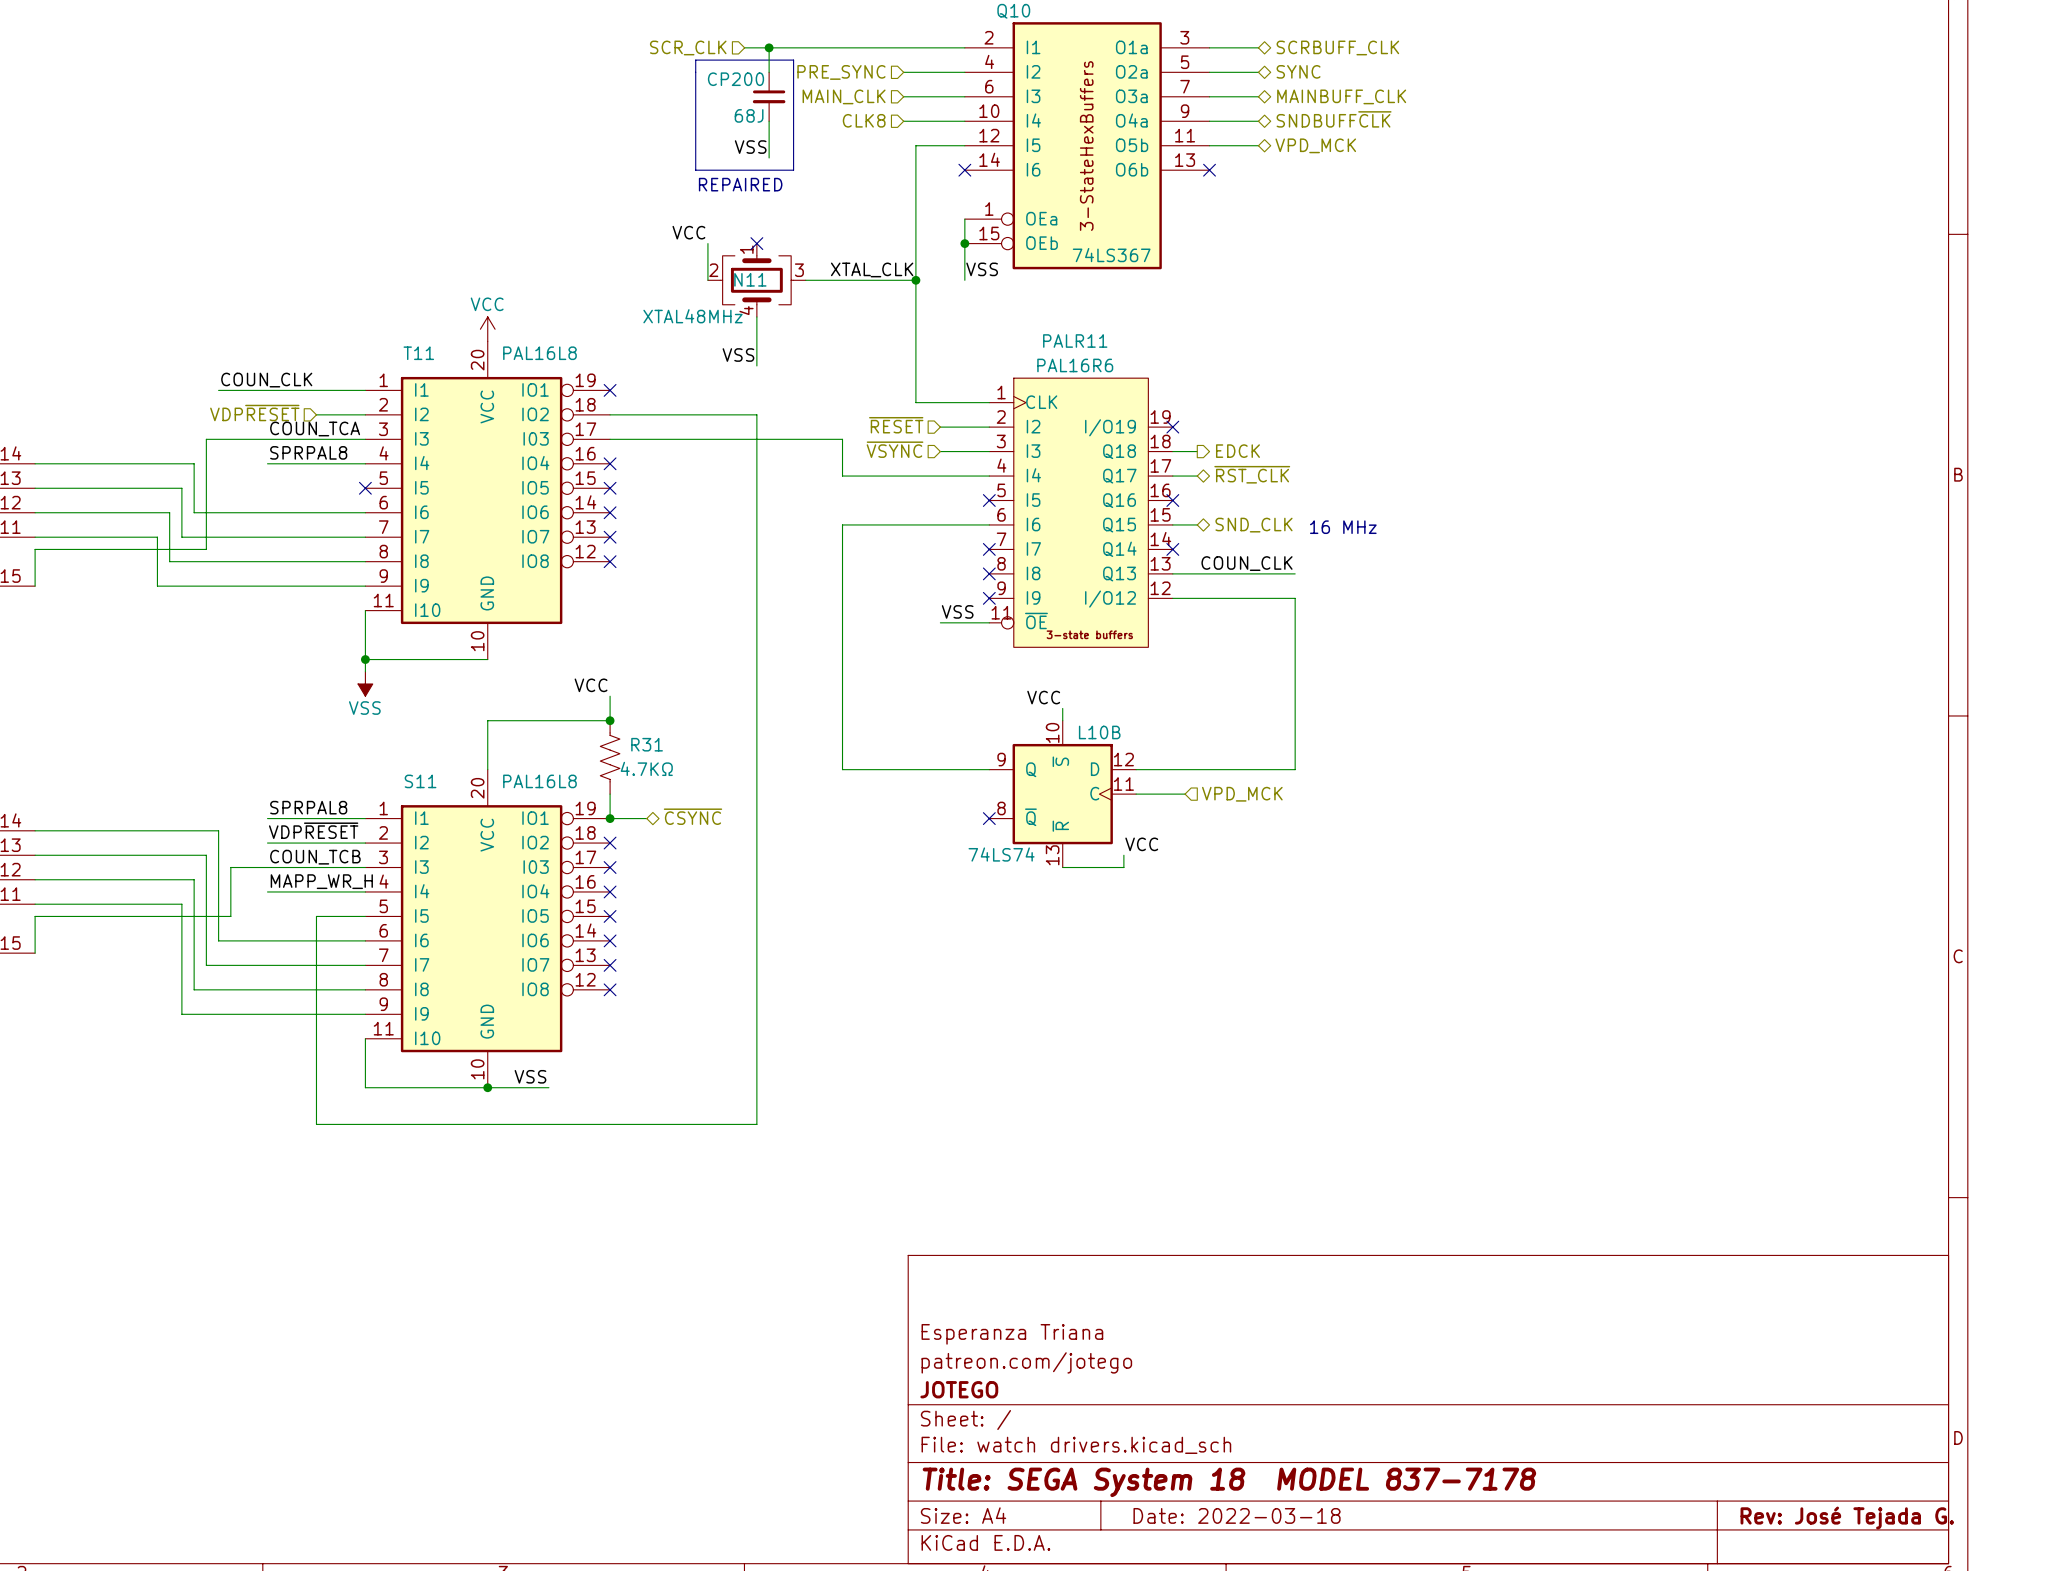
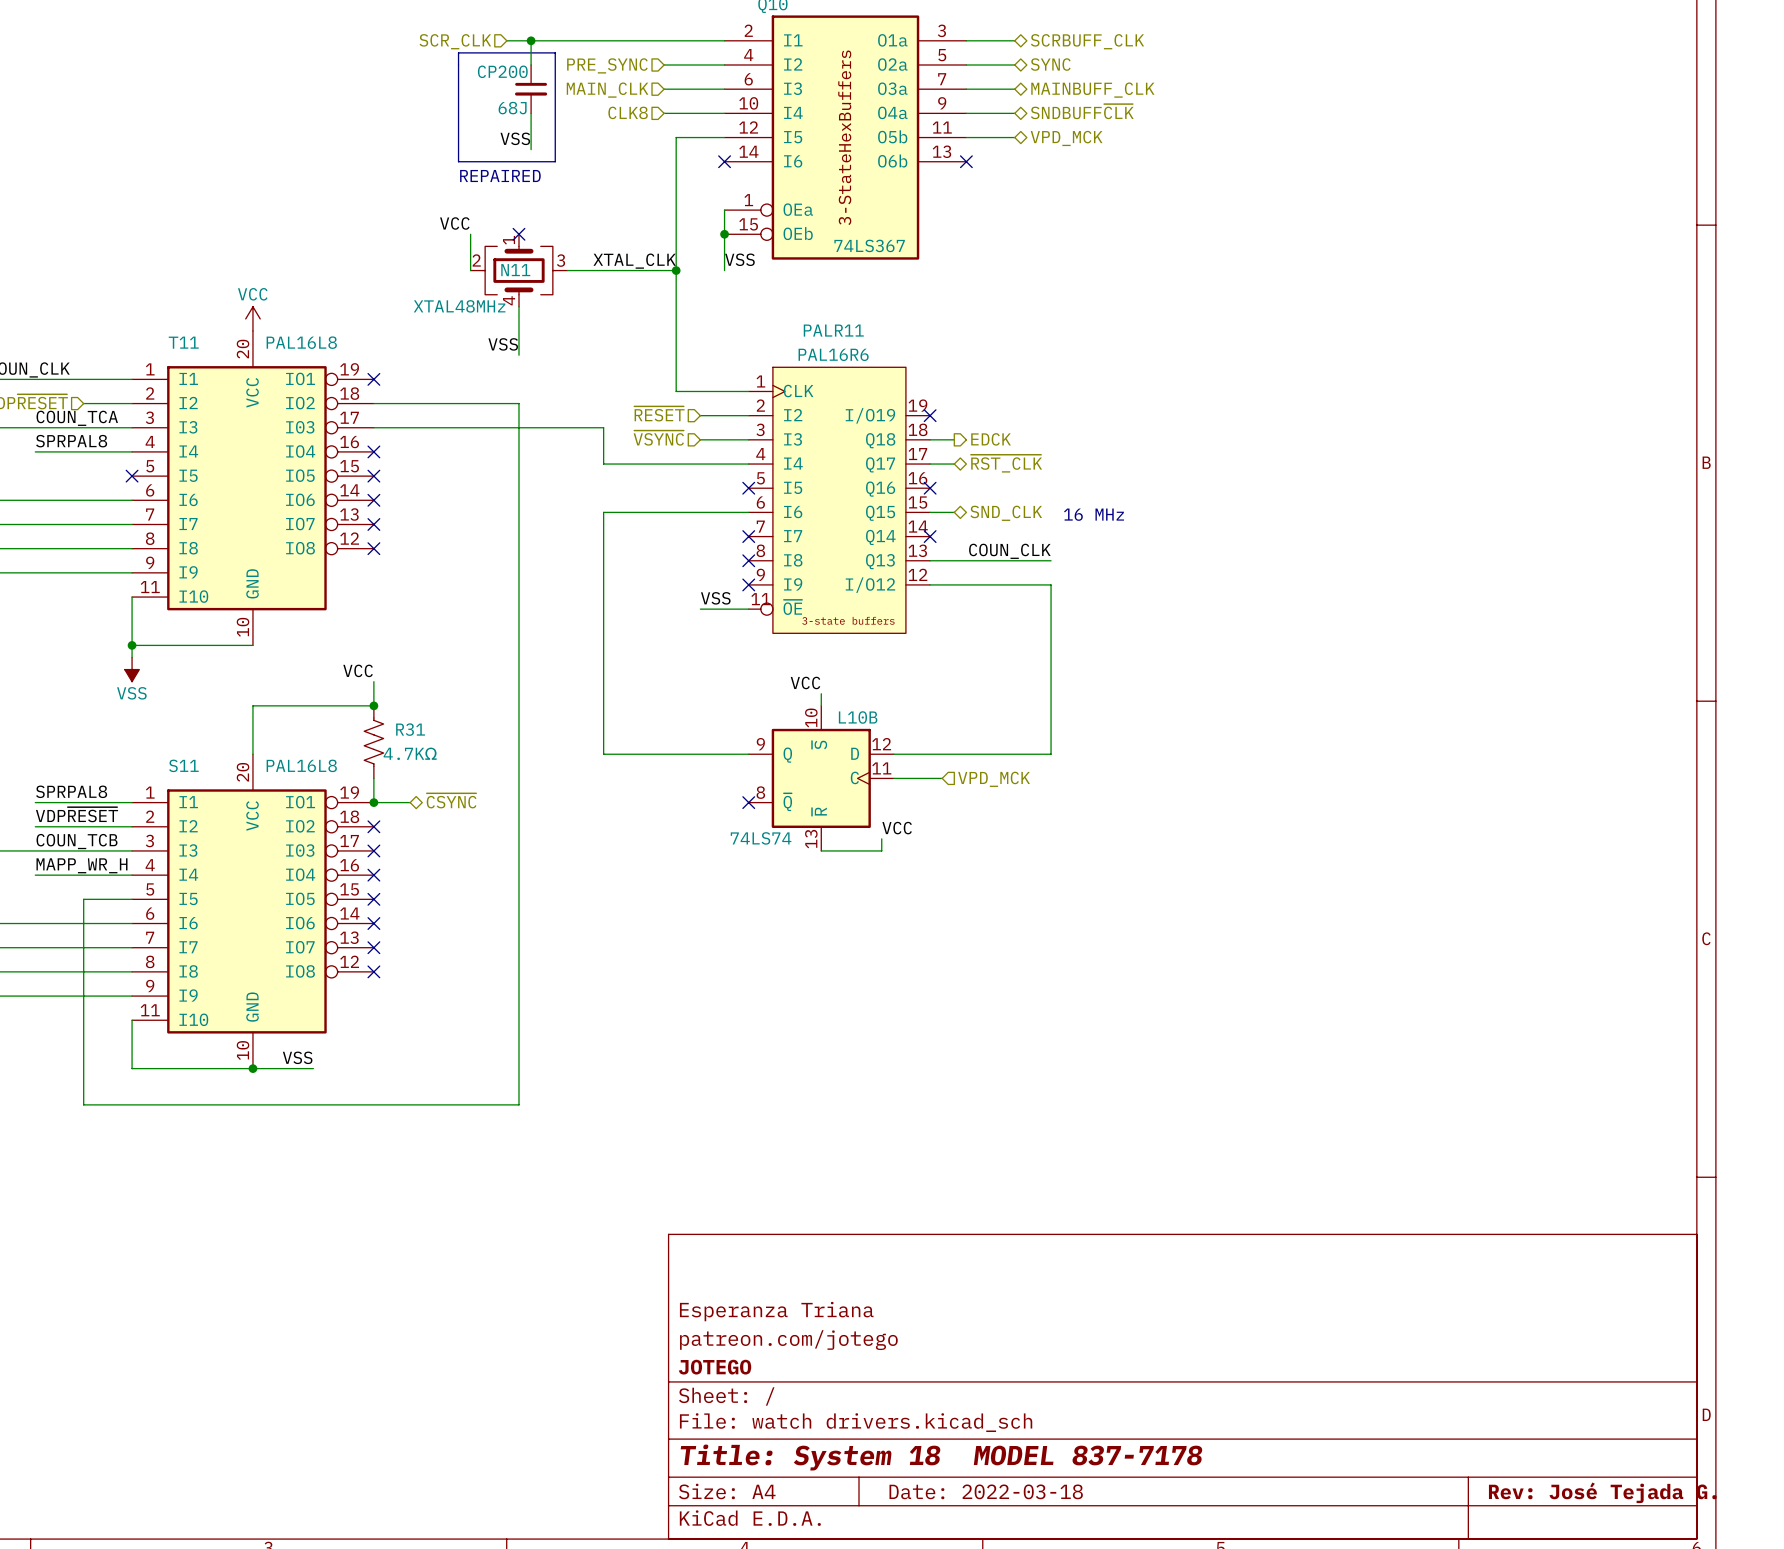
title block: Title: SEGA System 18 MODEL 837-7178 (1229, 1482) -> Title: System 18 MODEL 837-7178 (941, 1457)

